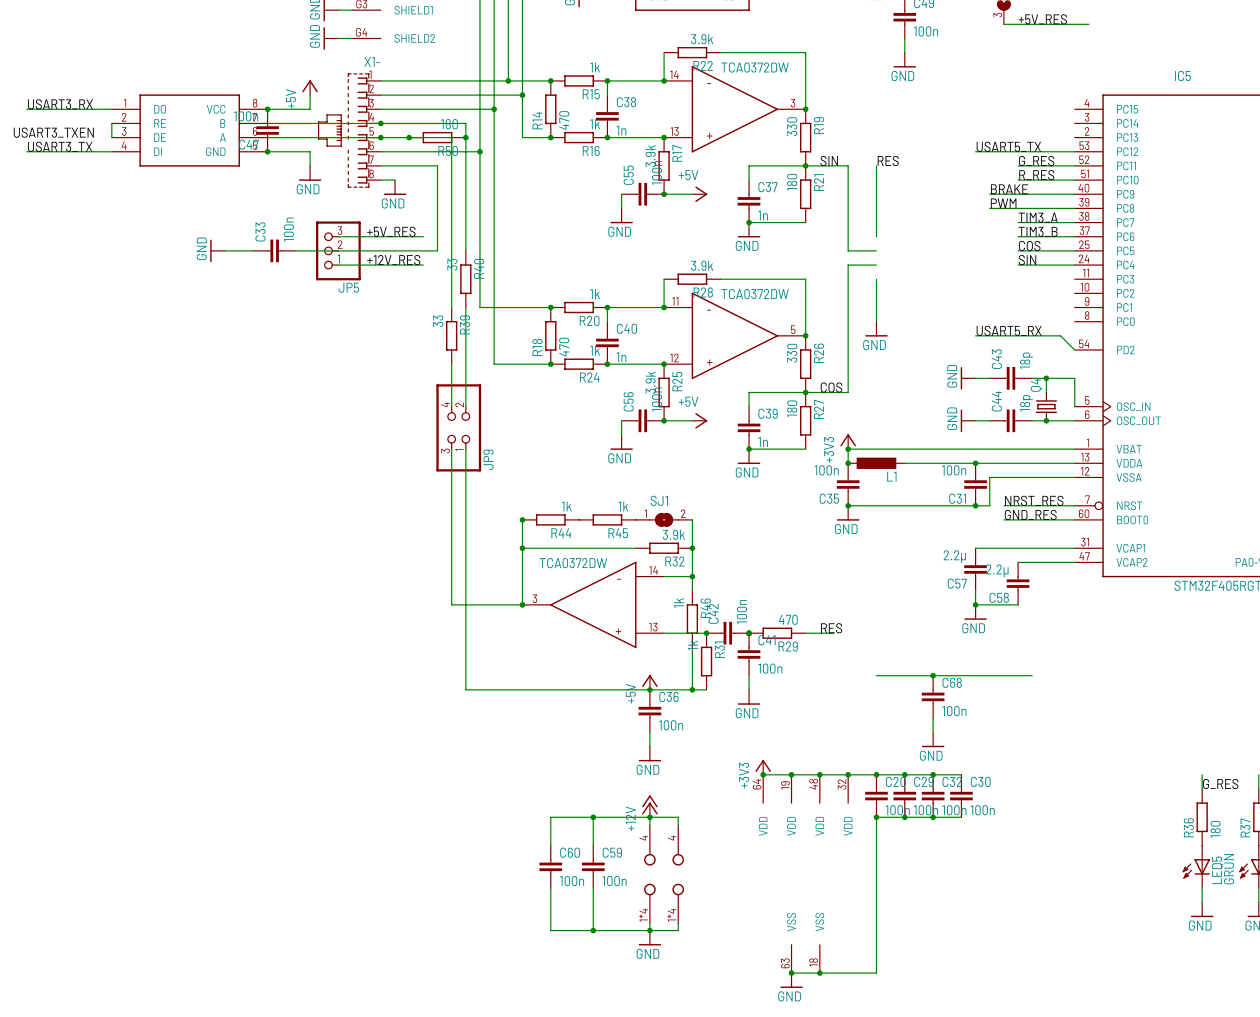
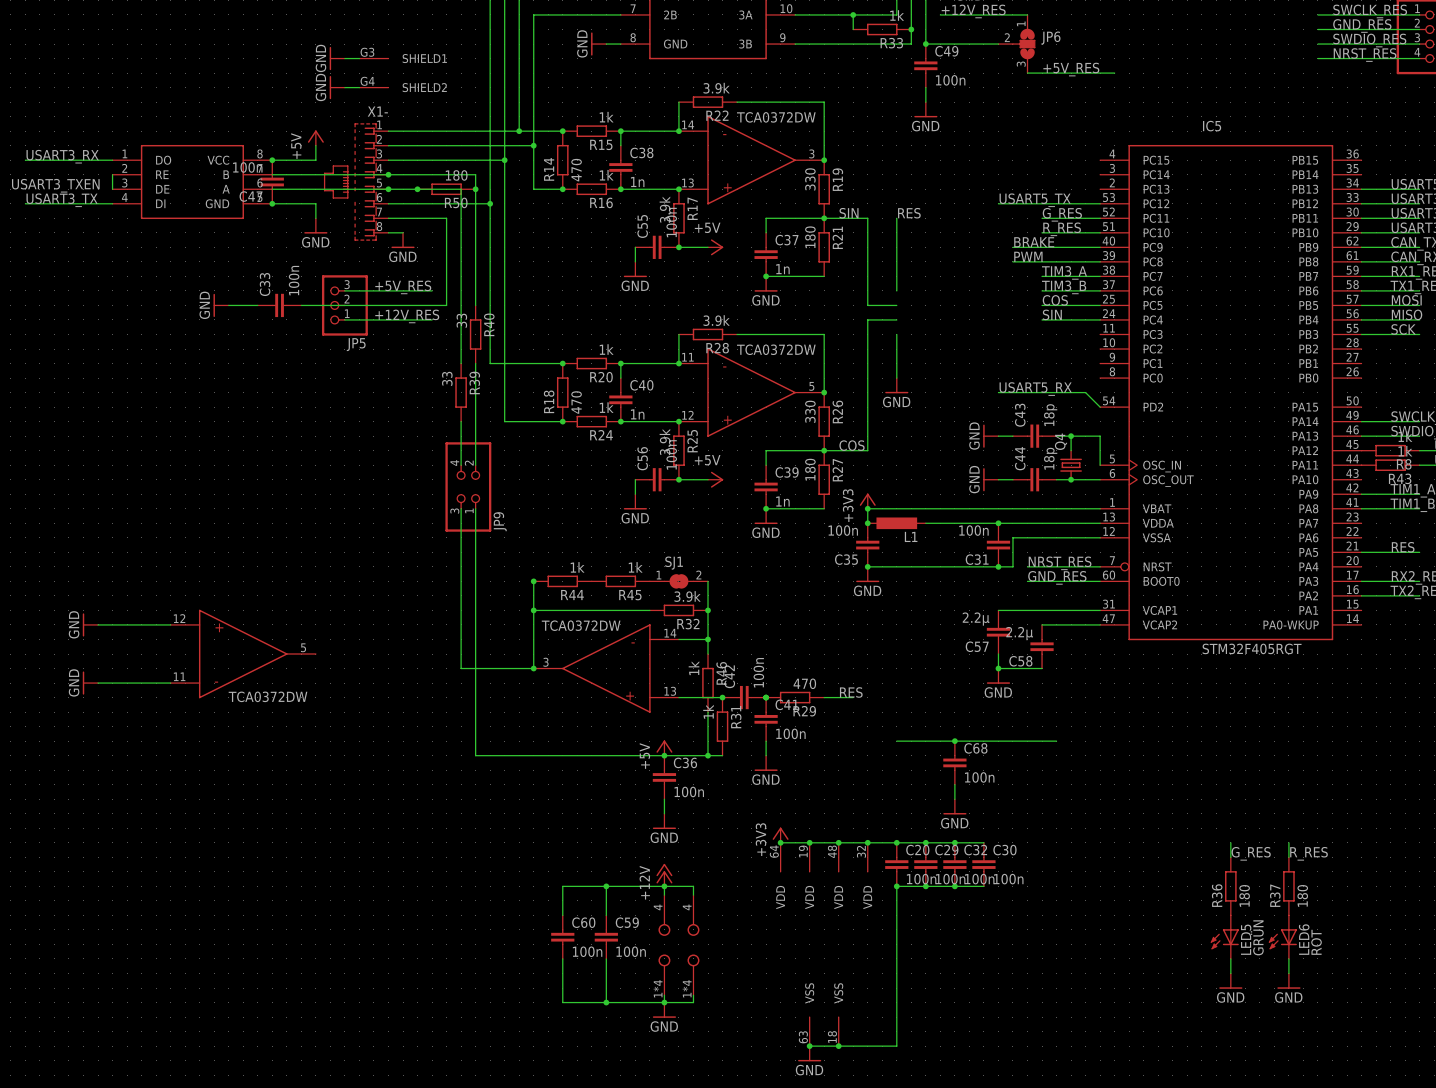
power symbol: none -> GND (90, 624)
wire: none -> (98, 624) (170, 624)
part: none -> (243, 654)
power symbol: none -> GND (90, 683)
wire: none -> (98, 683) (170, 683)

